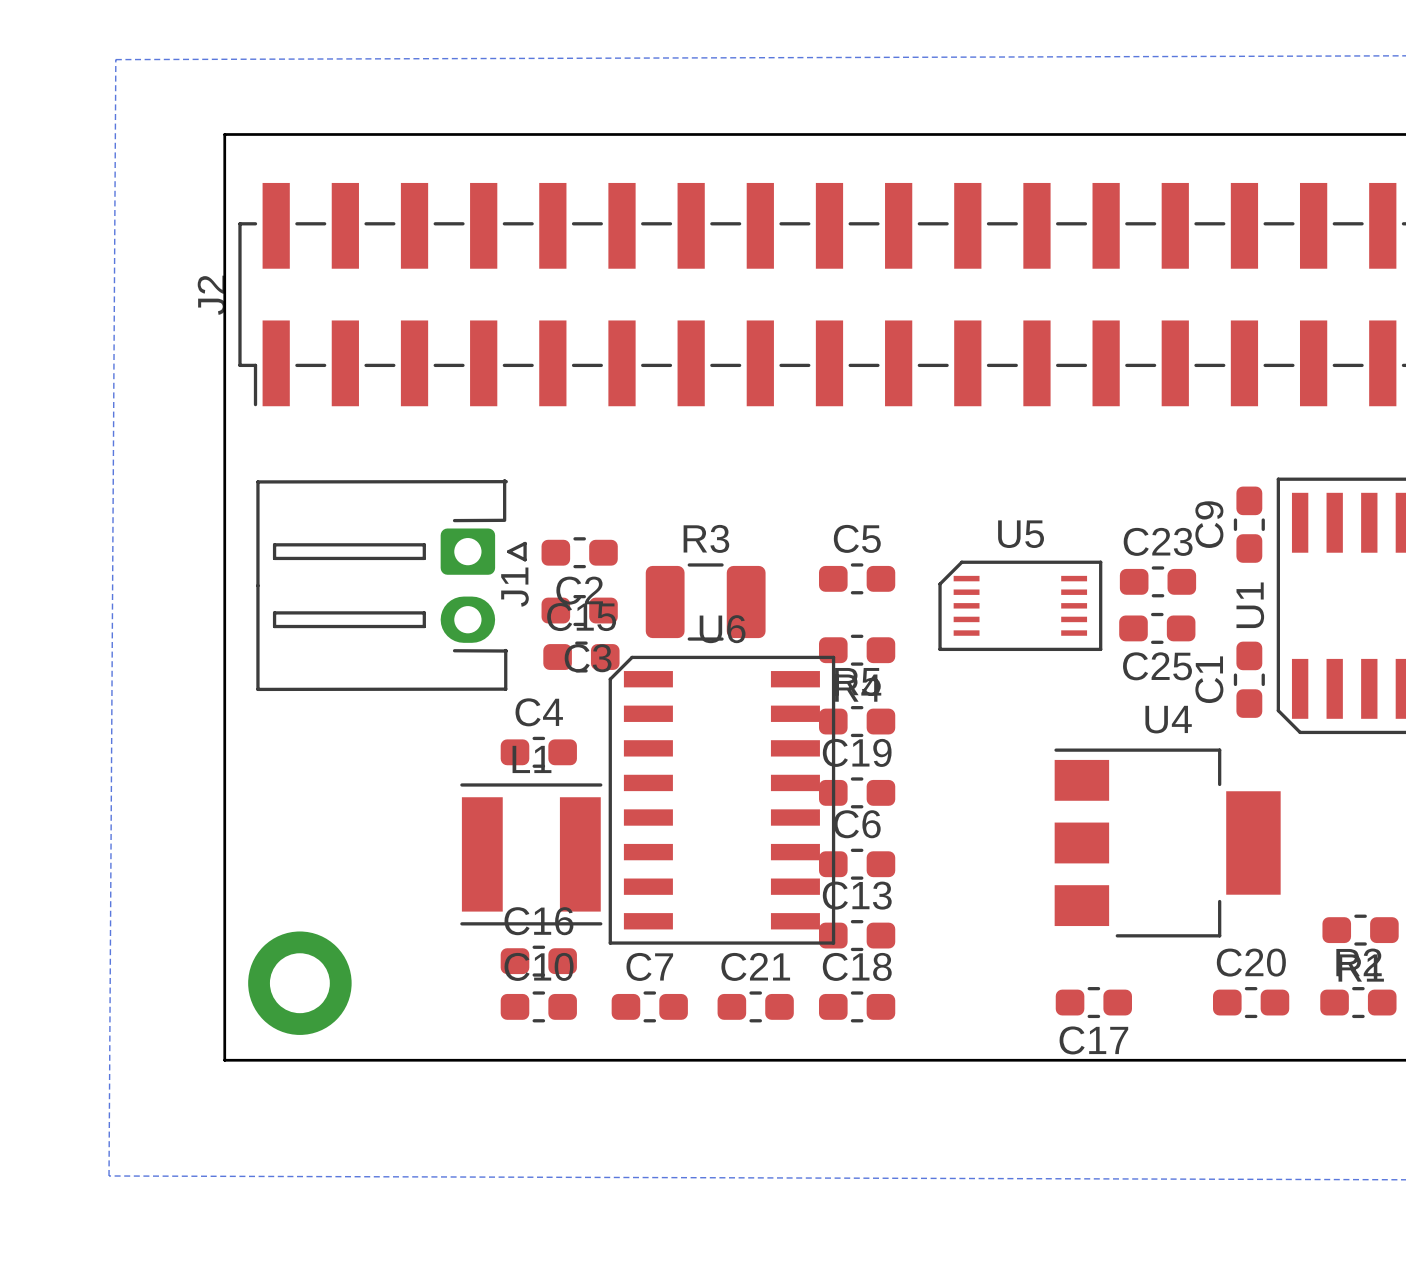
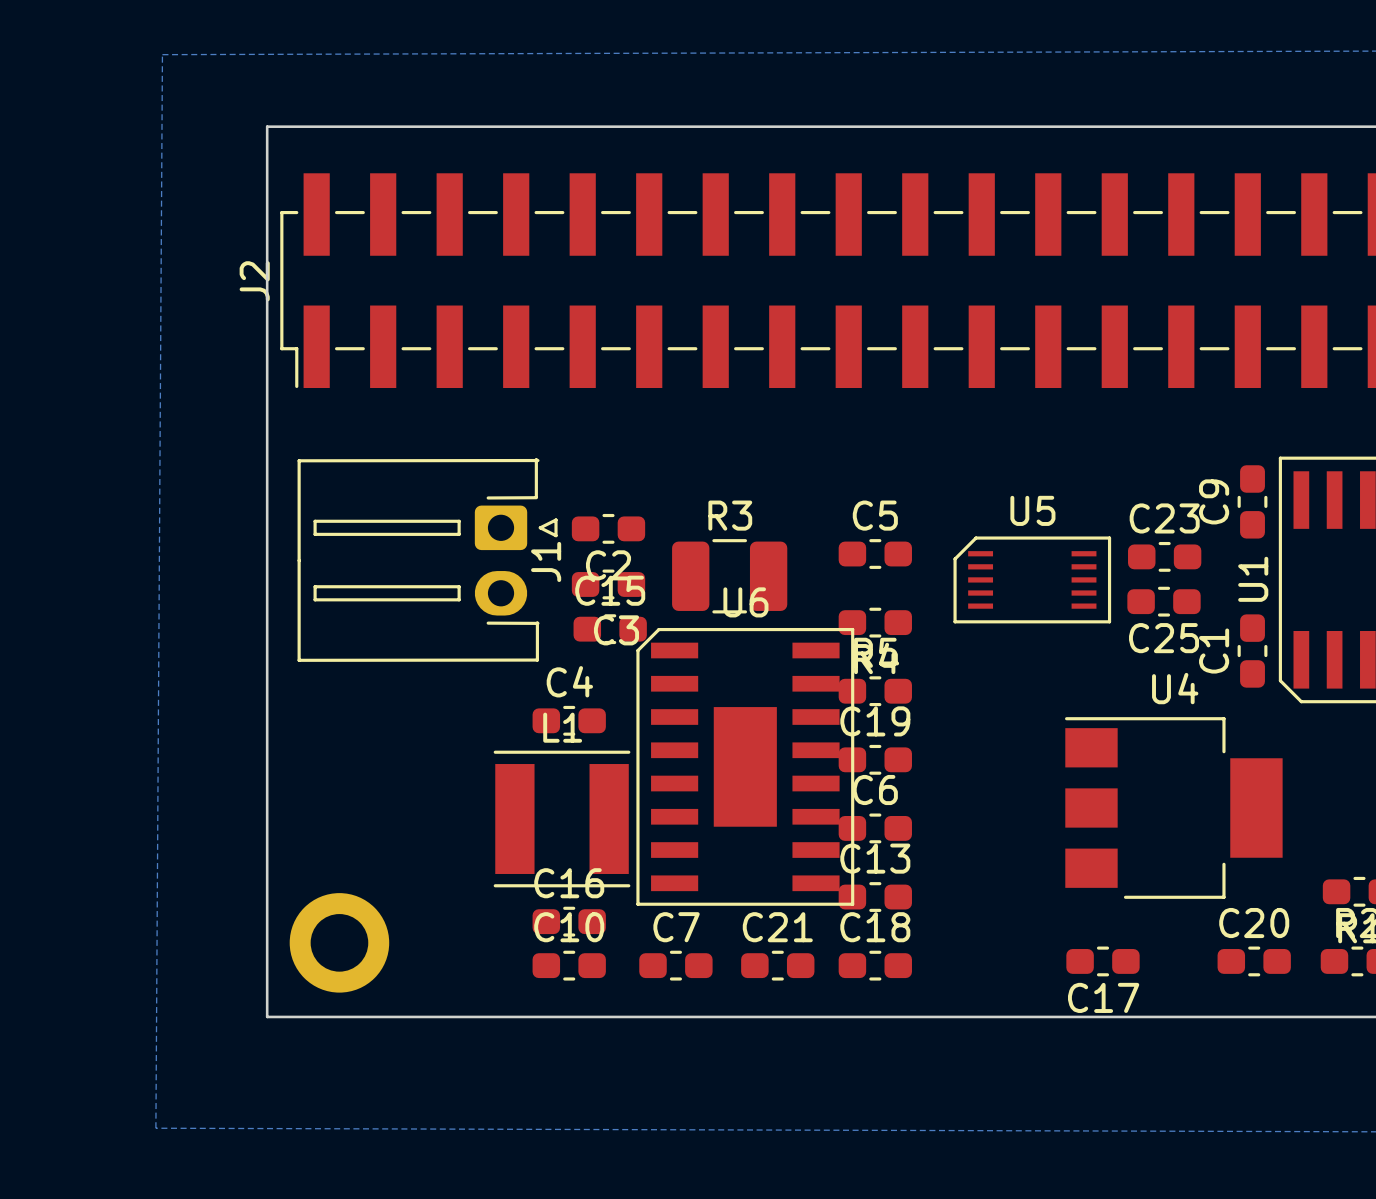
U6 footprint: [608, 655, 836, 945] -> [636, 627, 855, 906]

